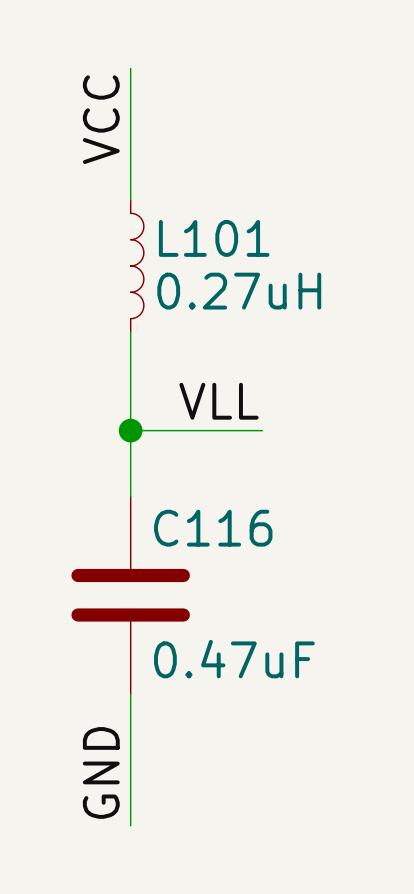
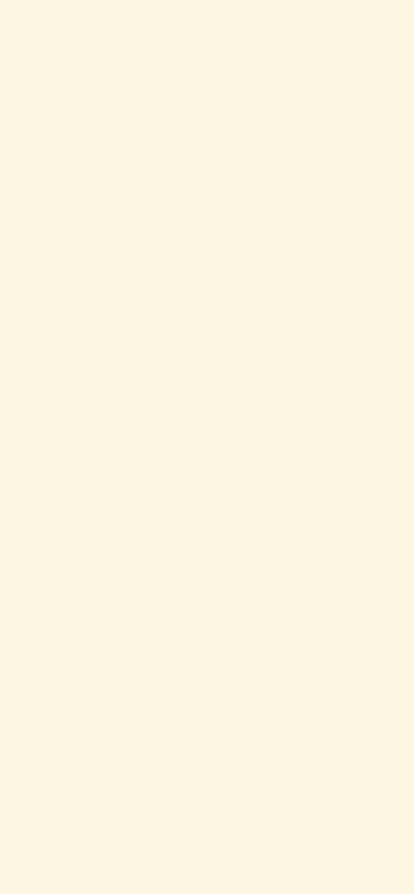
wire: (130, 68) (130, 200) -> none
label: VCC (101, 119) -> none
L101: 0.27uH (137, 266) -> none
wire: (130, 331) (130, 496) -> none
label: VLL (219, 401) -> none
wire: (130, 430) (262, 430) -> none
junction: (130, 430) -> none
C116: 0.47uF (130, 595) -> none
wire: (130, 694) (130, 825) -> none
label: GND (101, 772) -> none

